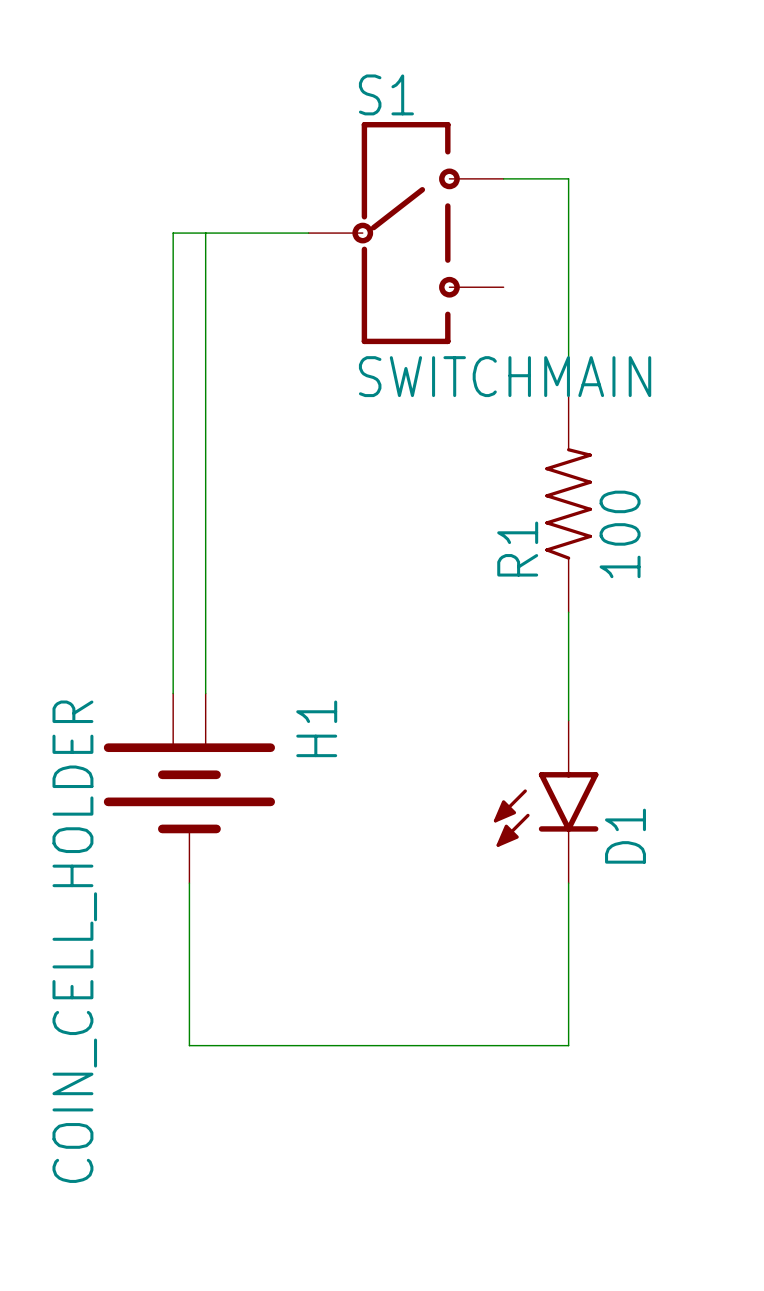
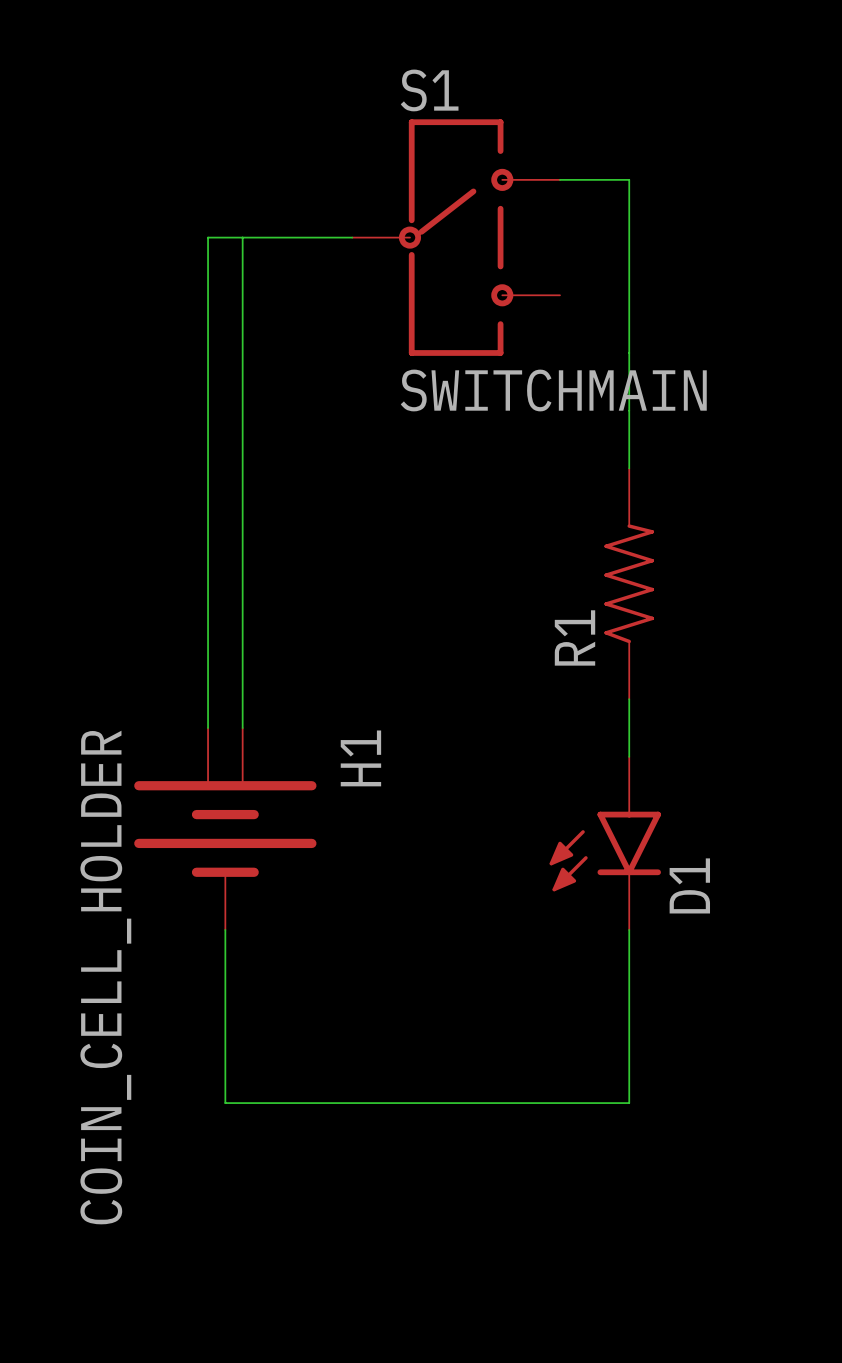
R1 position: (568, 503) -> (629, 583)
R1 value: 100 (620, 534) -> none

